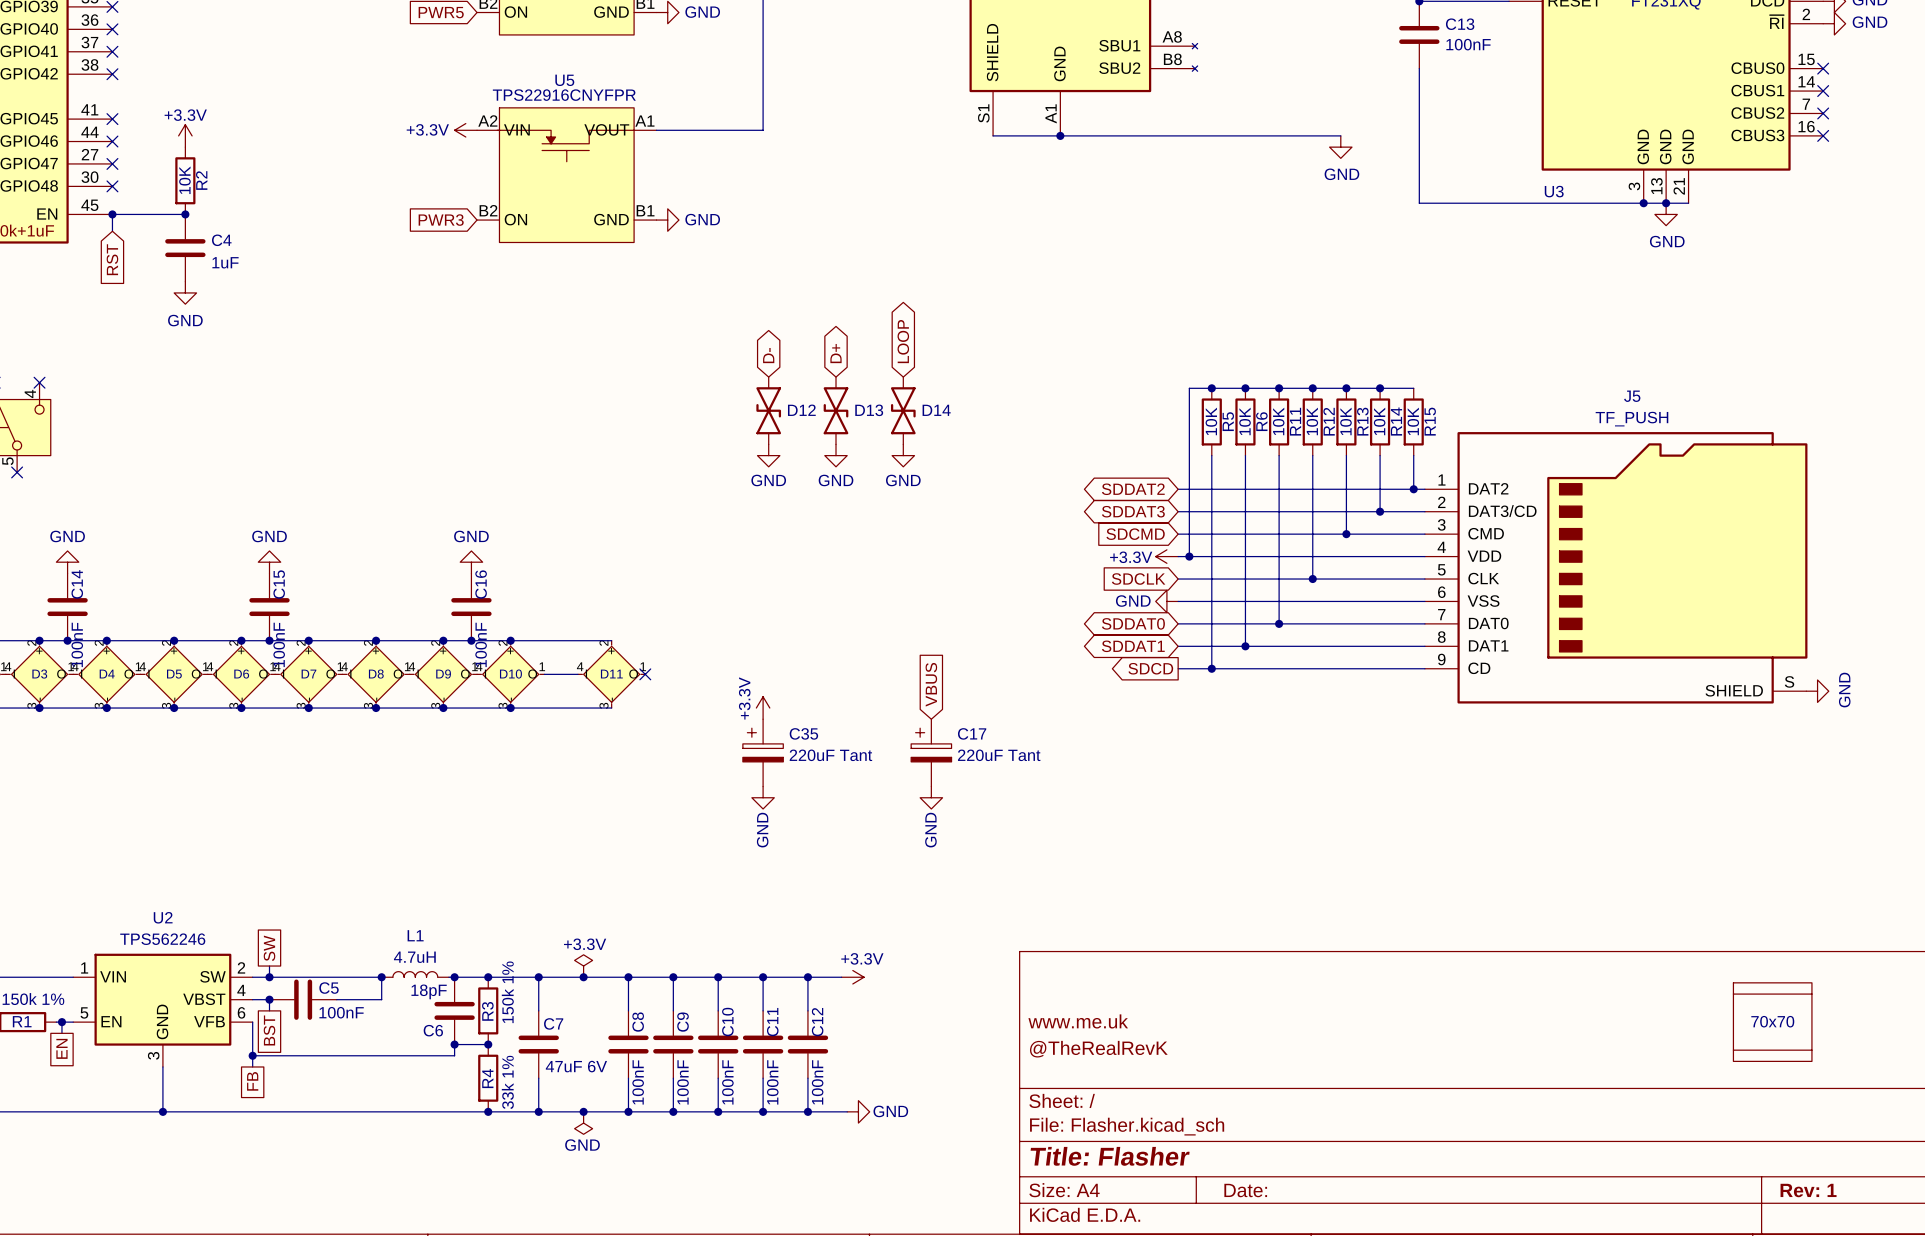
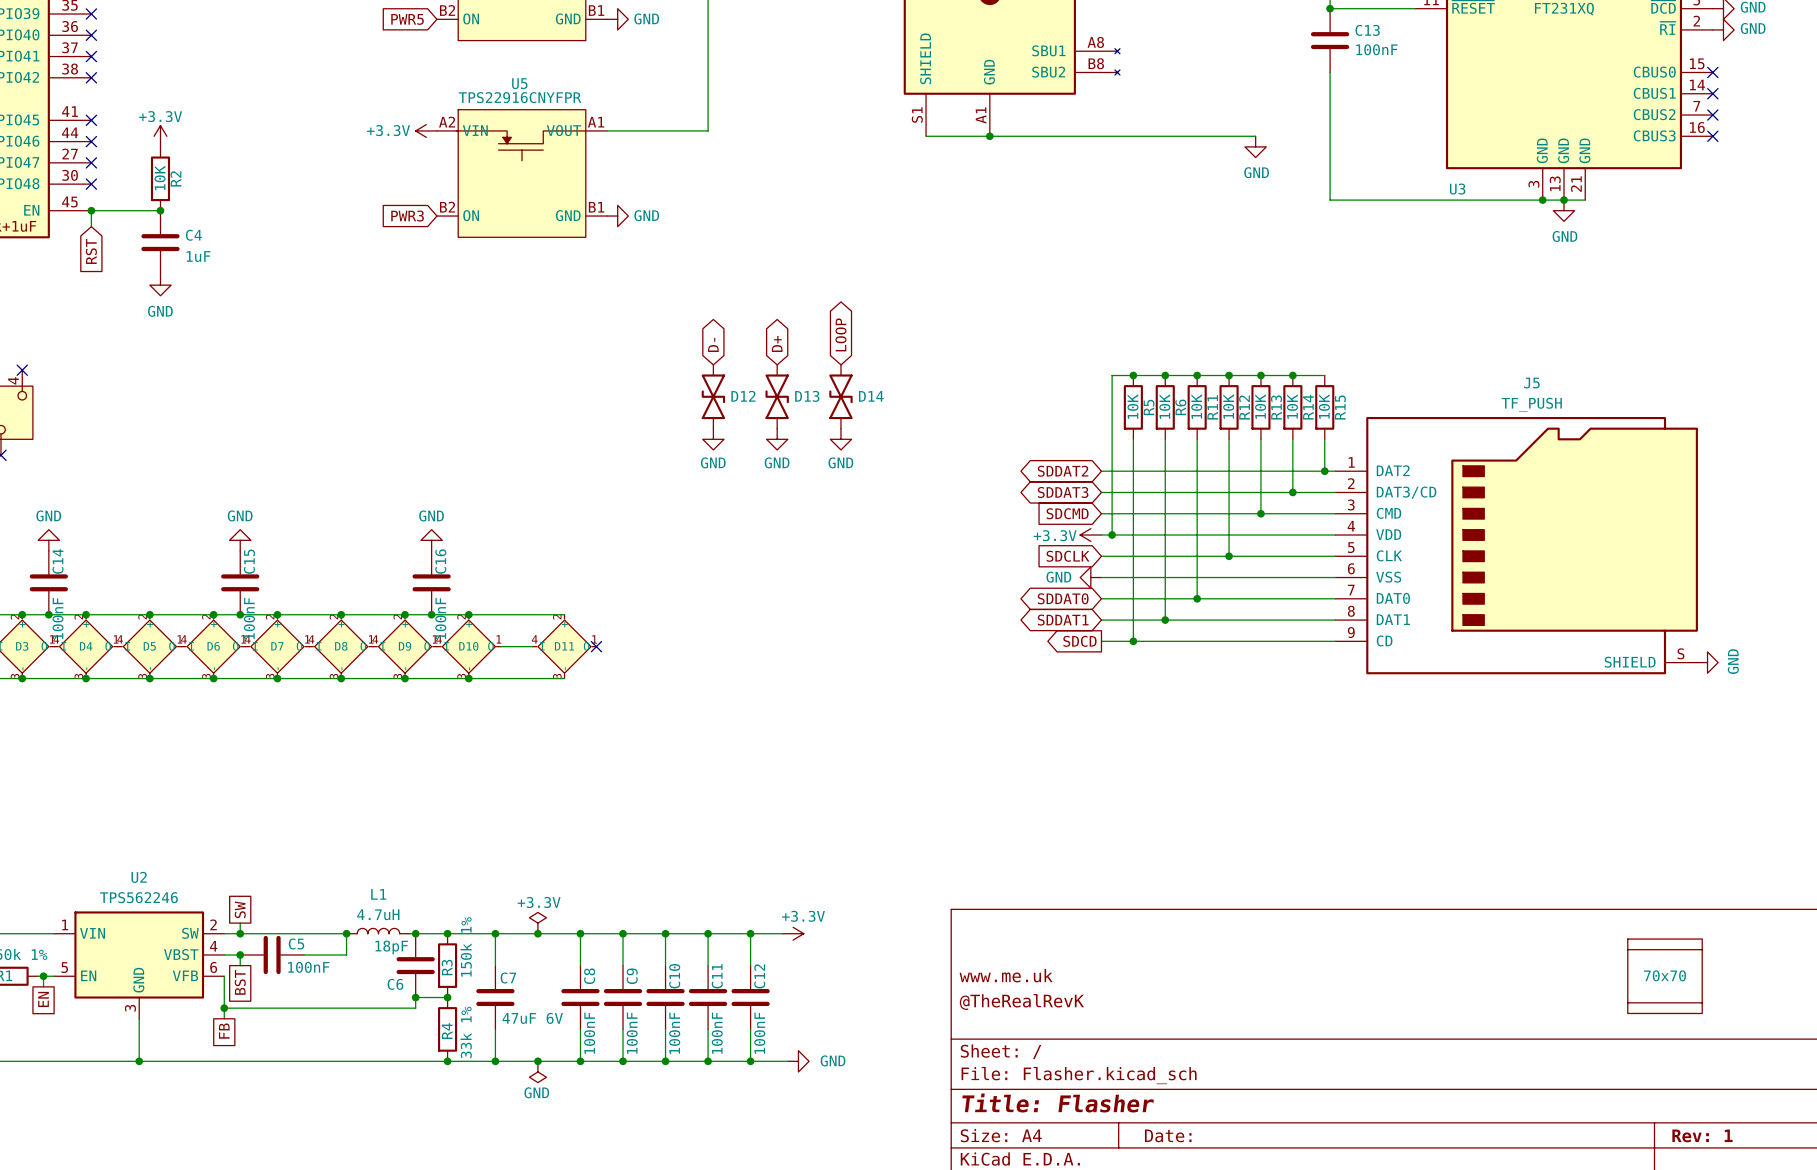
global label: VBUS (931, 684) -> none
power symbol: +3.3V (763, 708) -> none
C35: 220uF Tant (763, 752) -> none
C17: 220uF Tant (931, 752) -> none
power symbol: GND (763, 797) -> none
power symbol: GND (931, 797) -> none

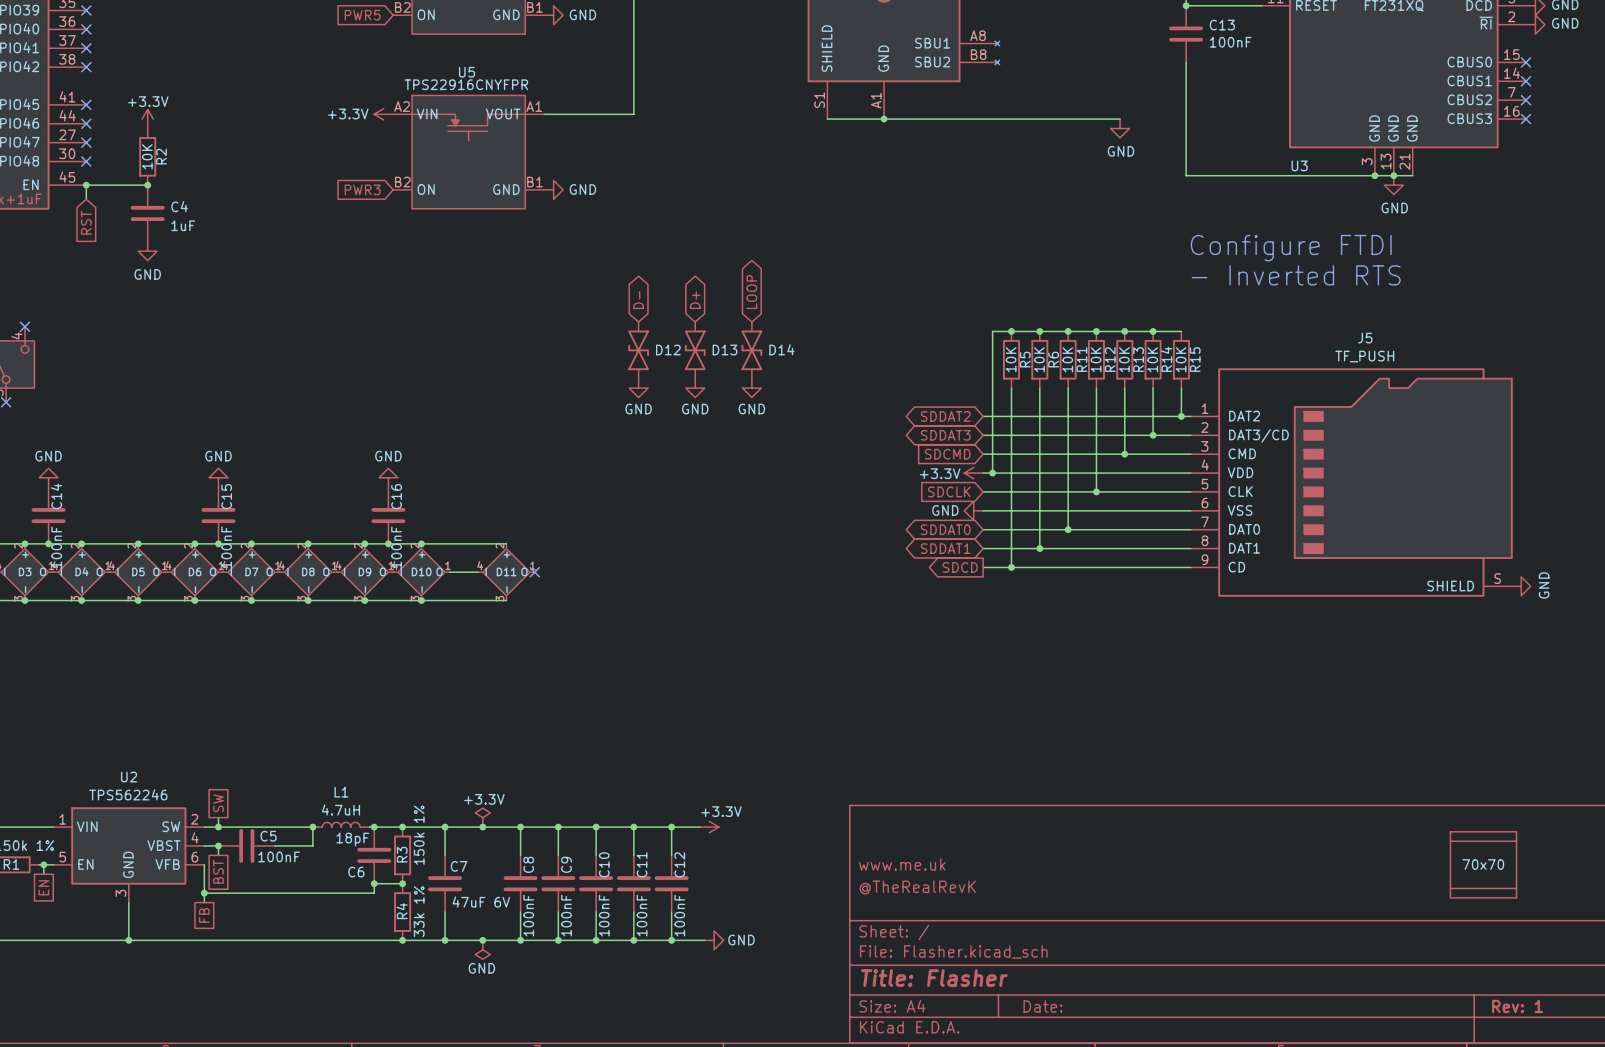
text: none -> Configure FTDI (1291, 248)
text: none -> - Inverted RTS (1296, 275)

